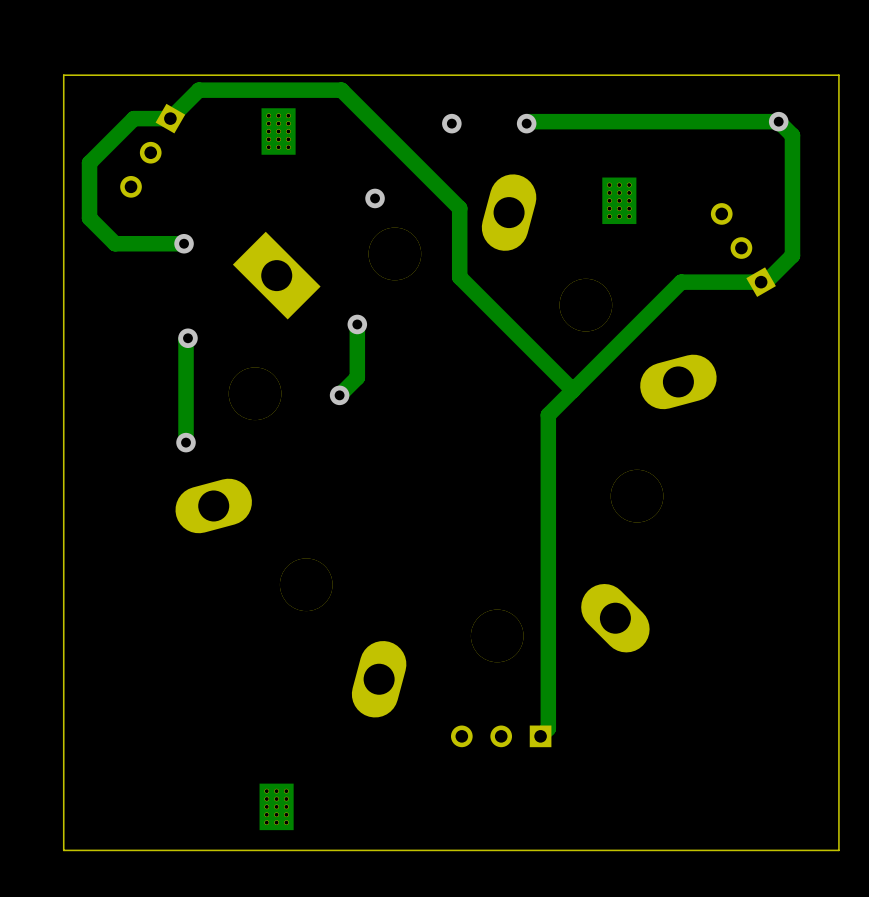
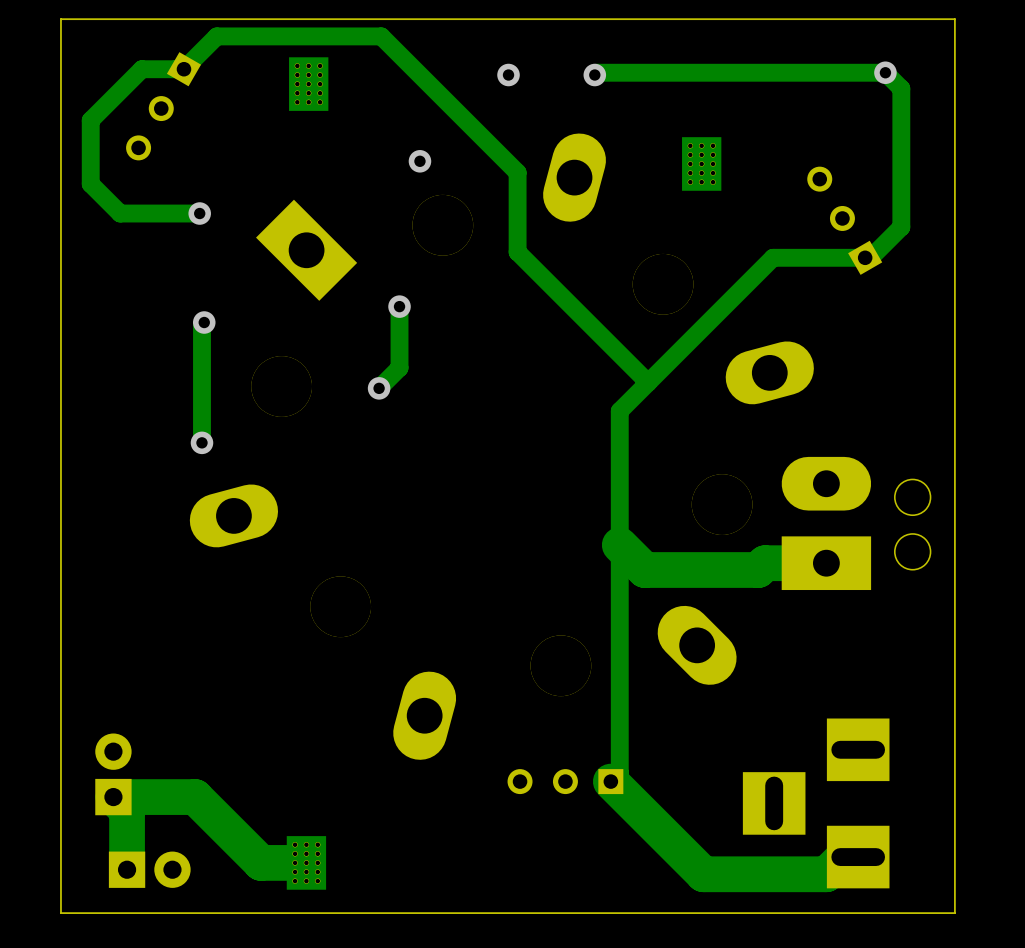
part: none -> (856, 523)
track: none -> (619, 545) (644, 570) (758, 570) (765, 563) (826, 563)
part: none -> (113, 774)
track: none -> (610, 781) (703, 874) (826, 874) (843, 857) (858, 857)
part: none -> (816, 803)
track: none -> (306, 862) (261, 862) (195, 797) (113, 797) (127, 810) (127, 869)
part: none -> (149, 869)

